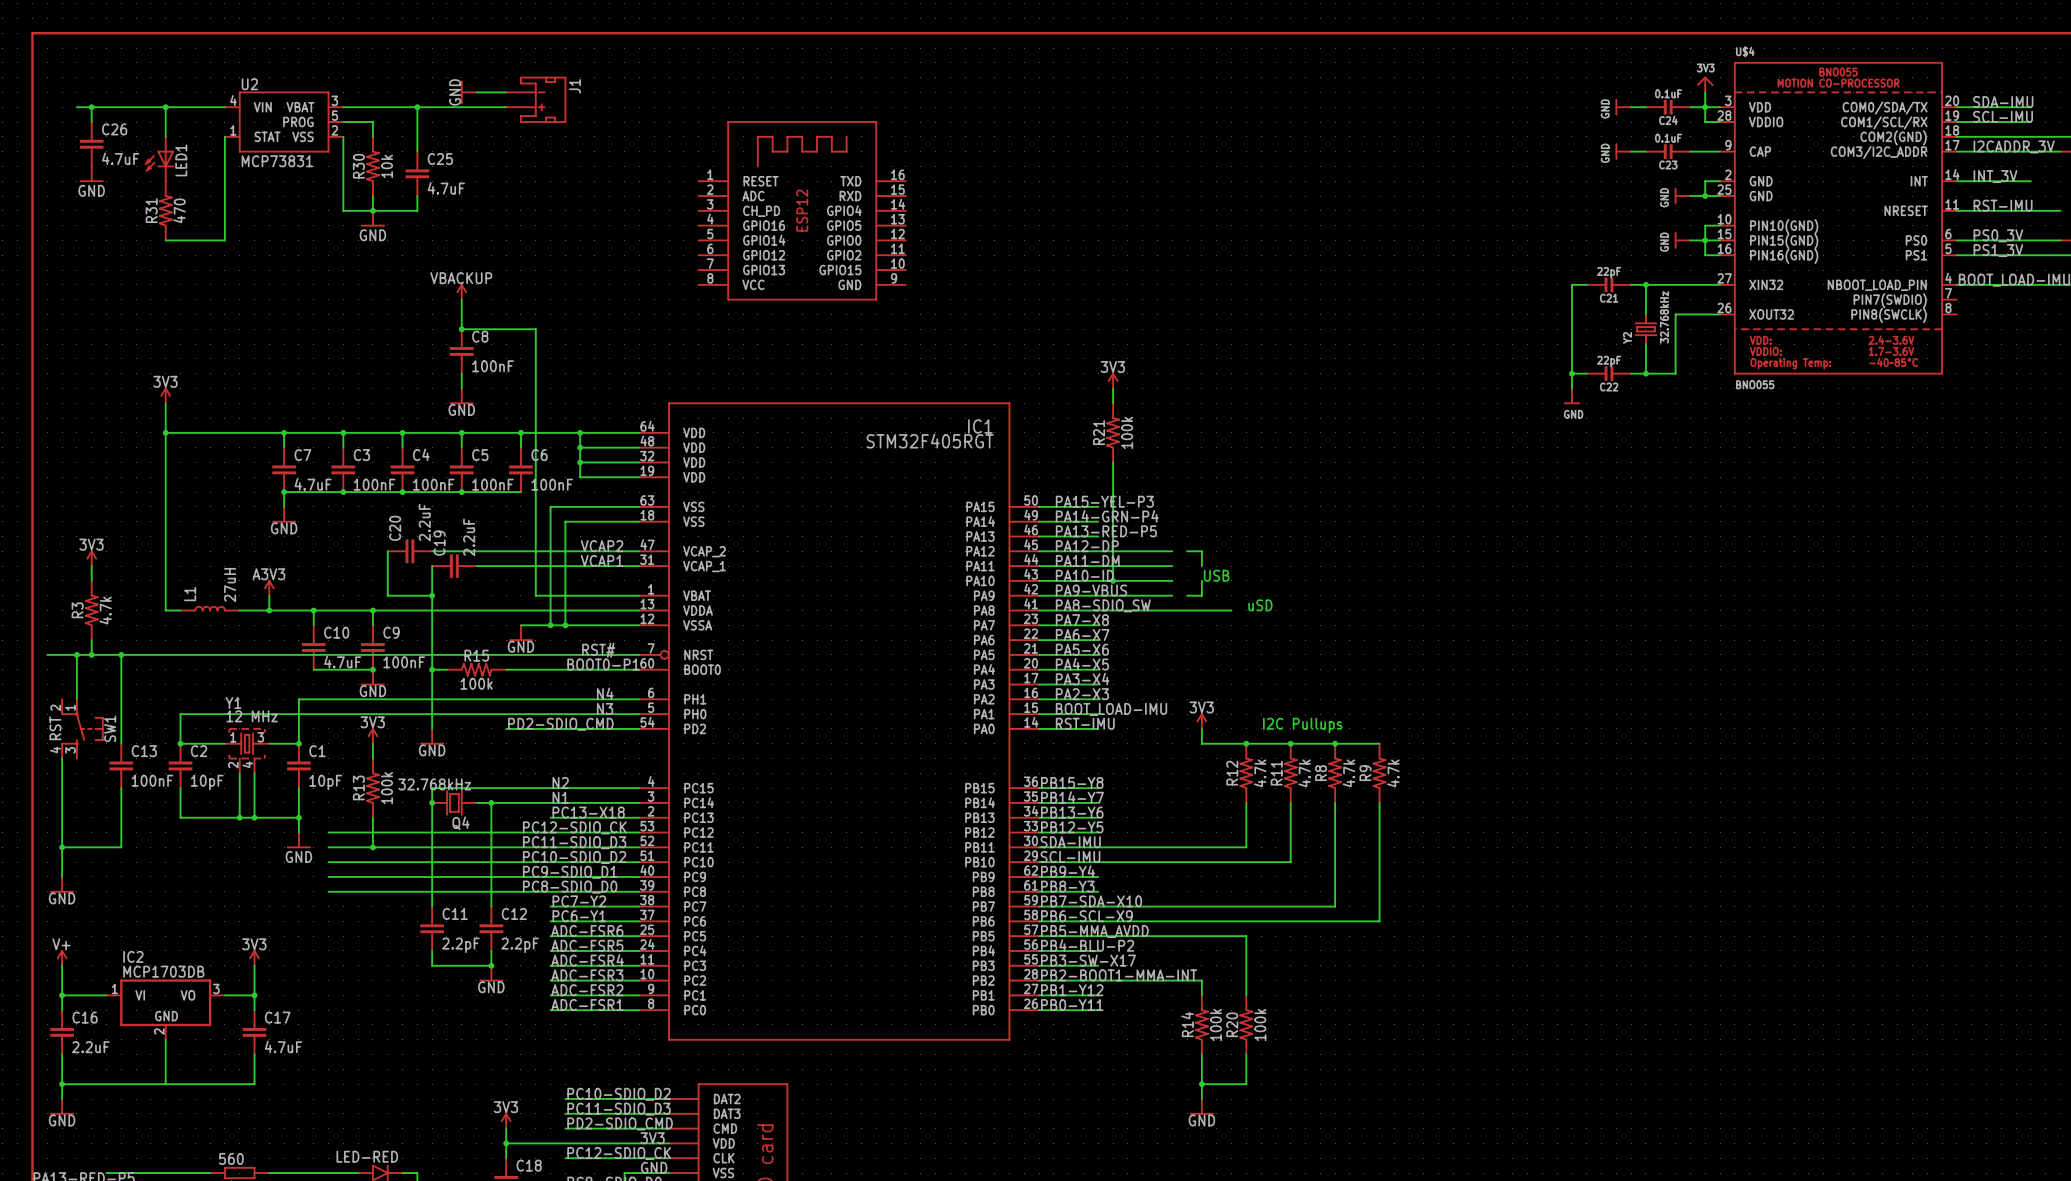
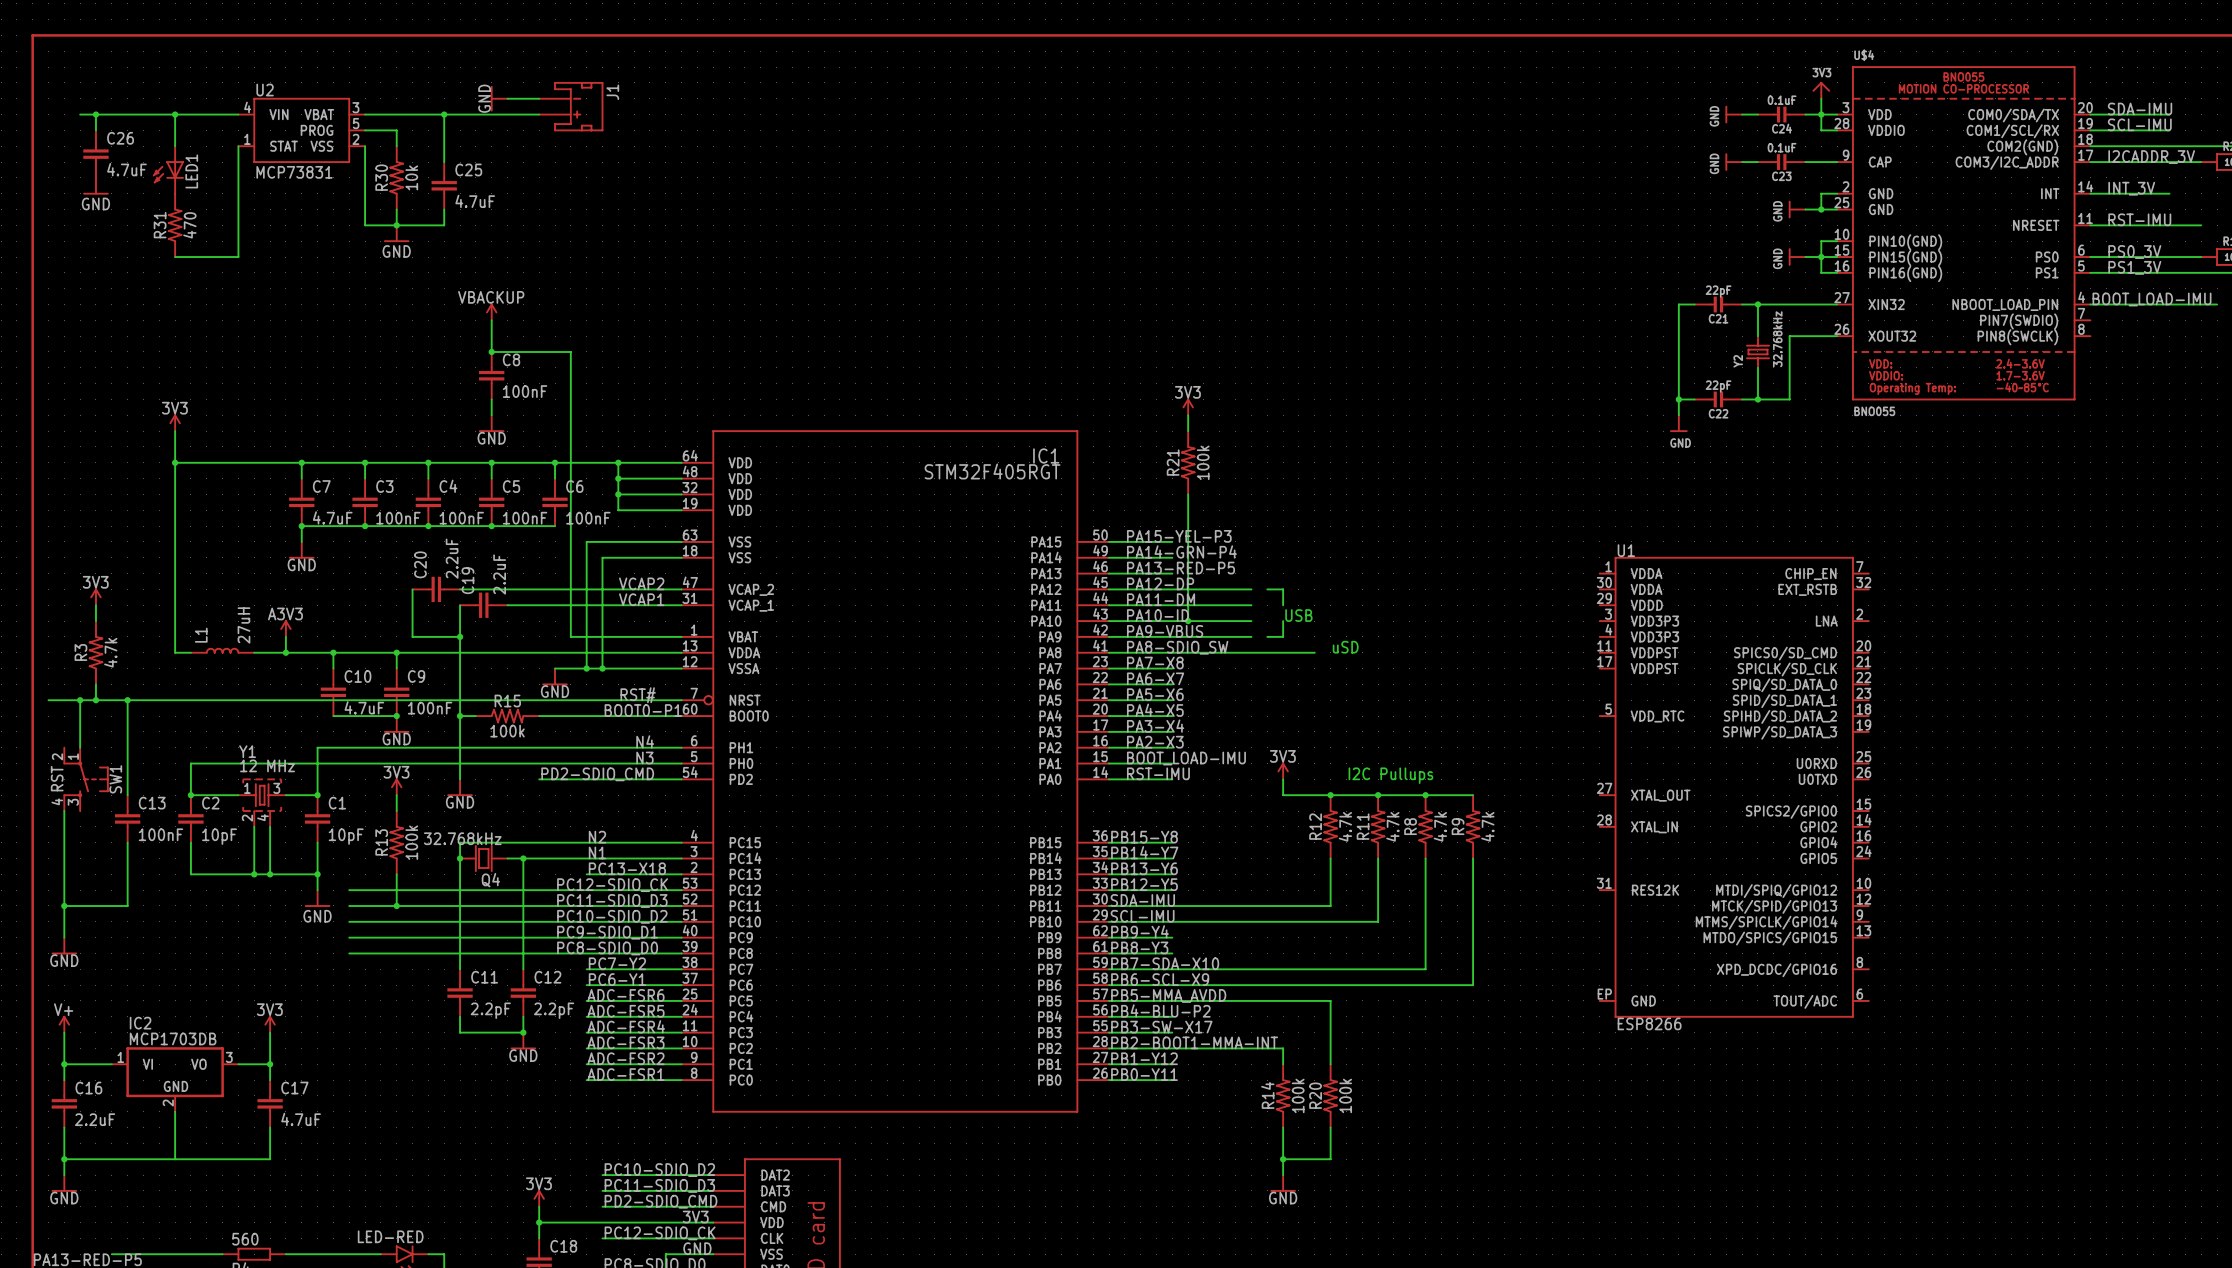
part: (802, 210) -> none
U1: none -> ESP8266 (1734, 787)

